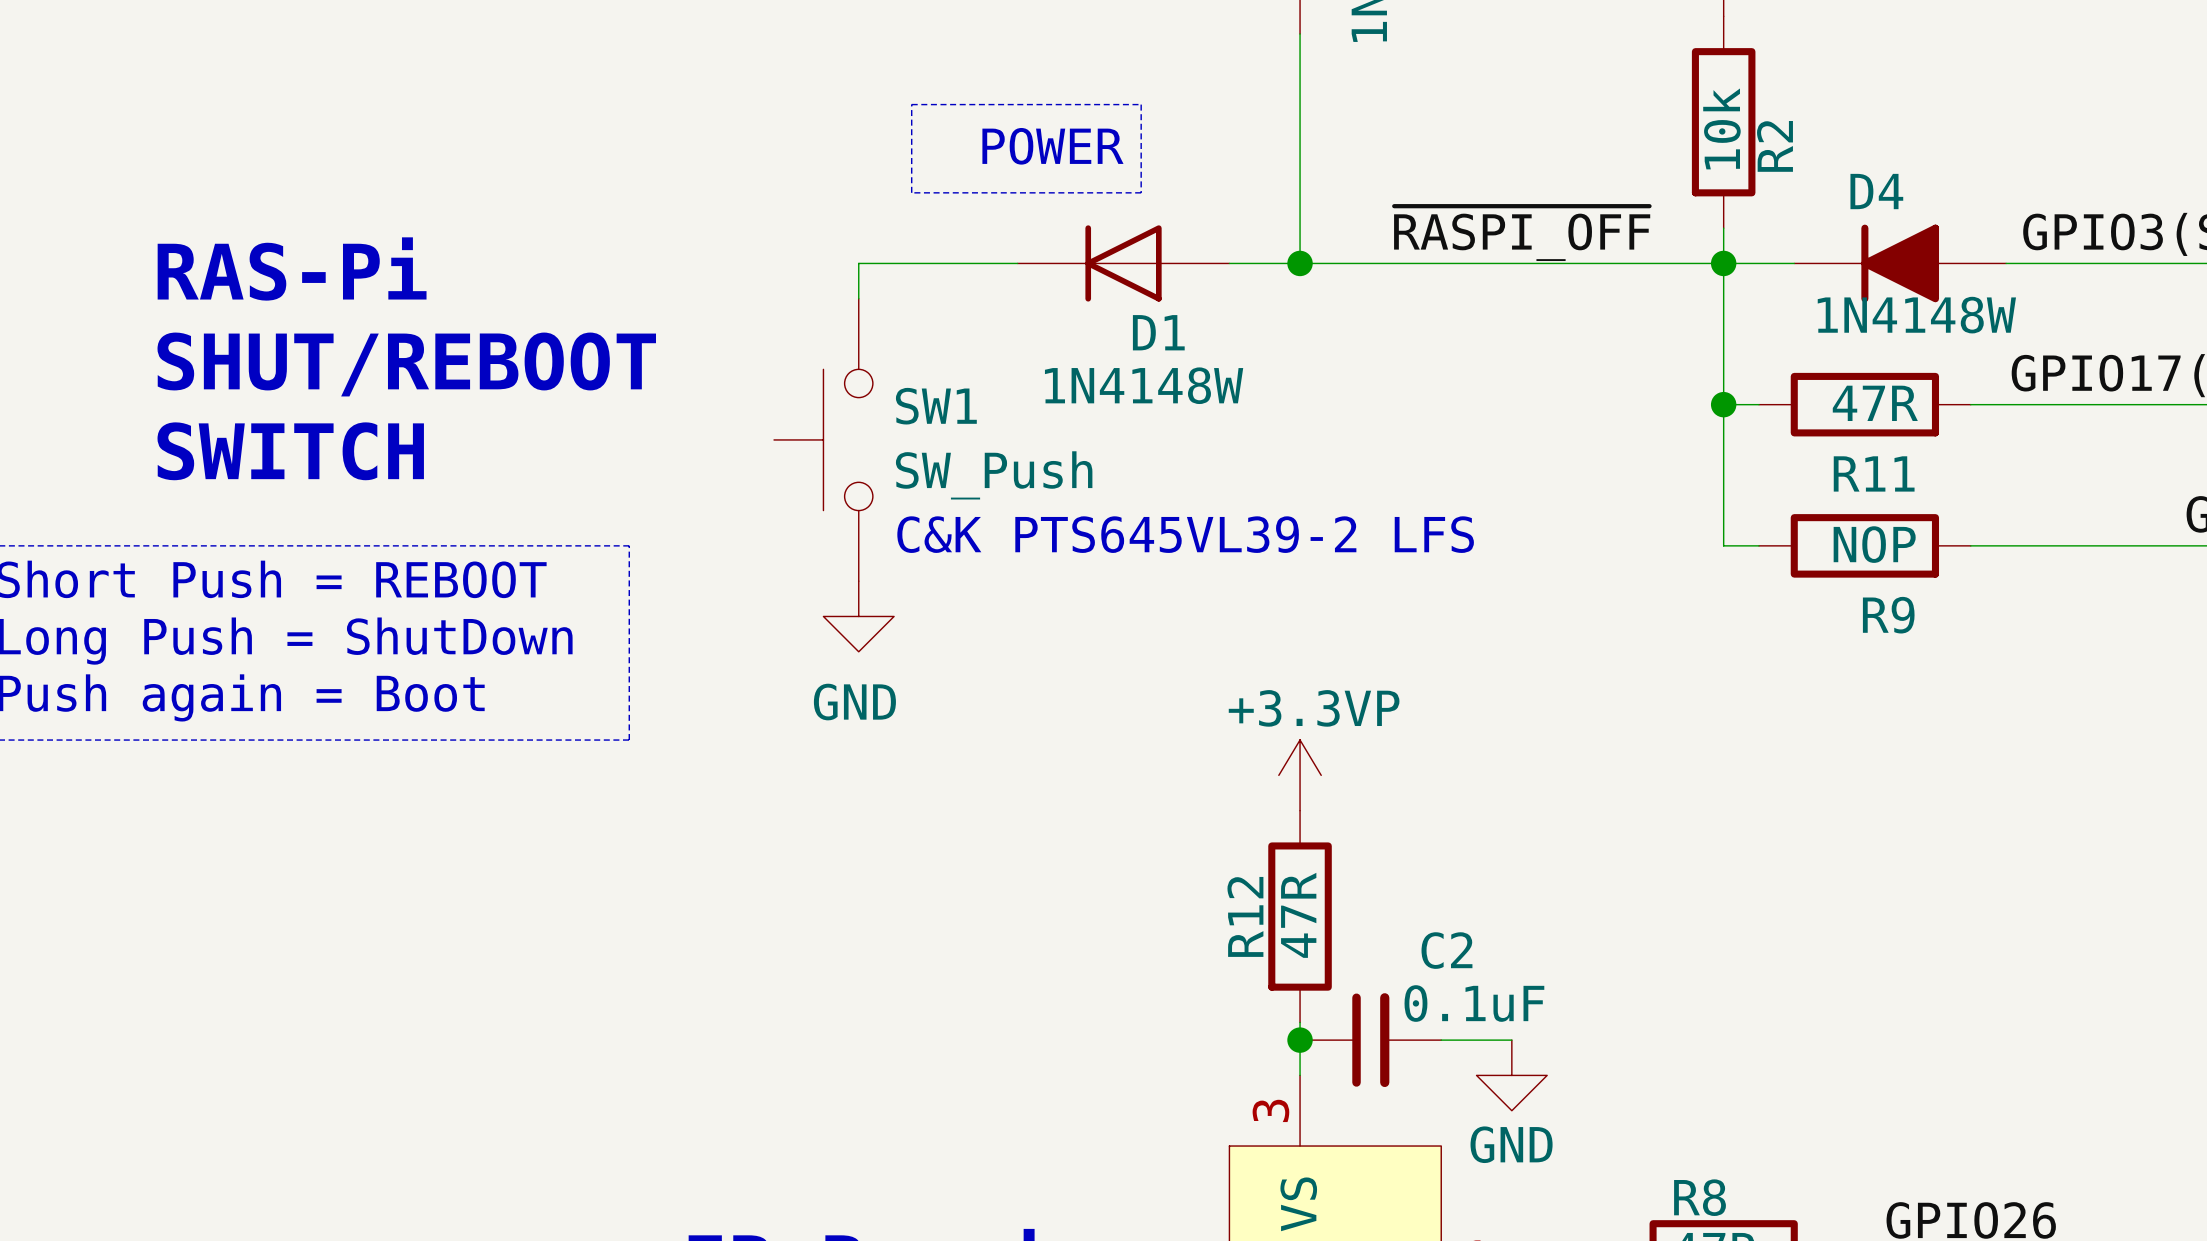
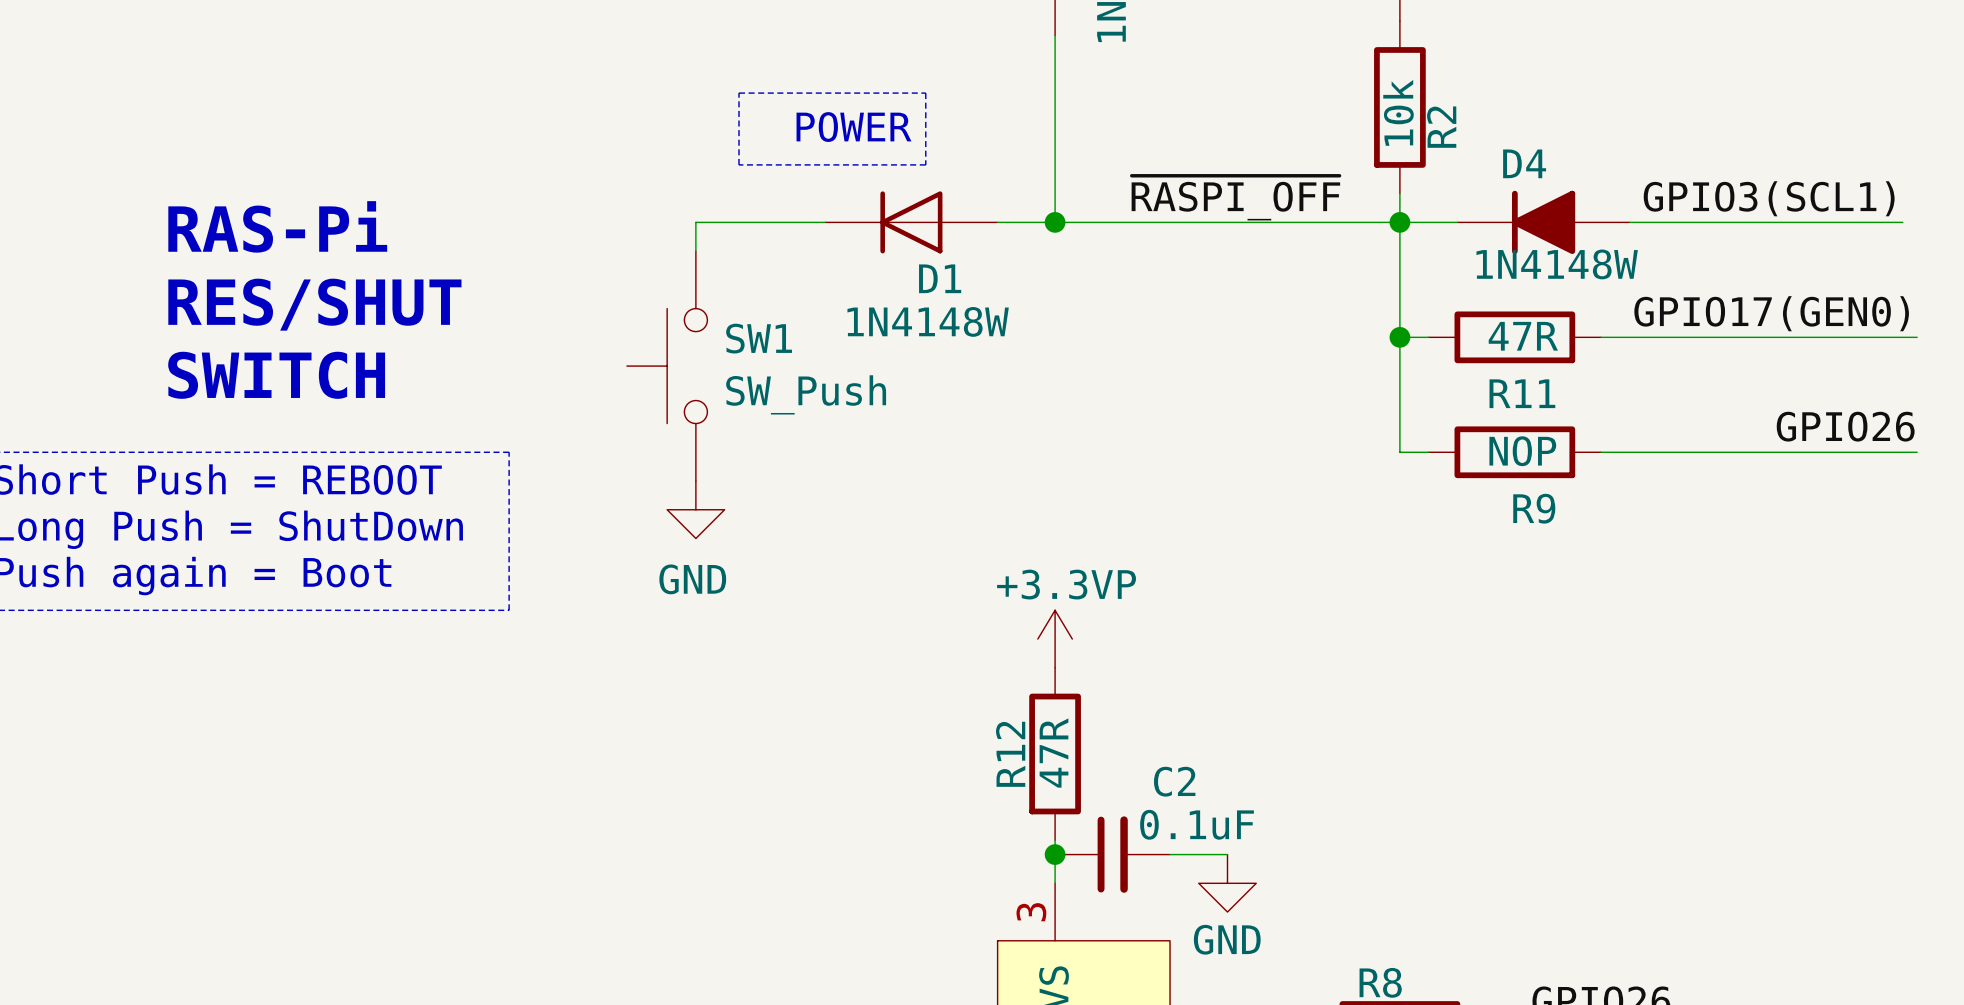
text position: RAS-Pi (292, 268) -> RAS-Pi (277, 226)
text: none -> RES/SHUT (314, 304)
text: SHUT/REBOOT (406, 364) -> none
text position: SWITCH (290, 451) -> SWITCH (276, 375)
text: C&K PTS645VL39-2 LFS (1185, 534) -> none

